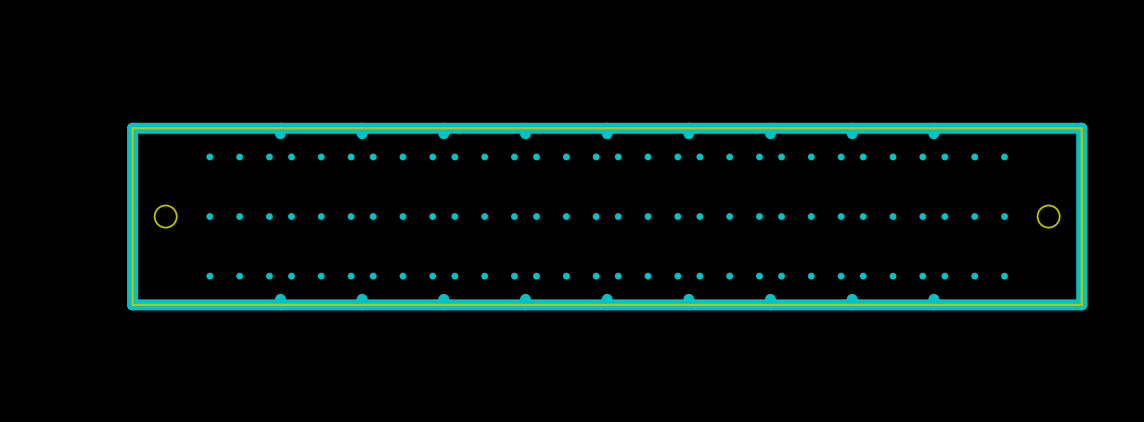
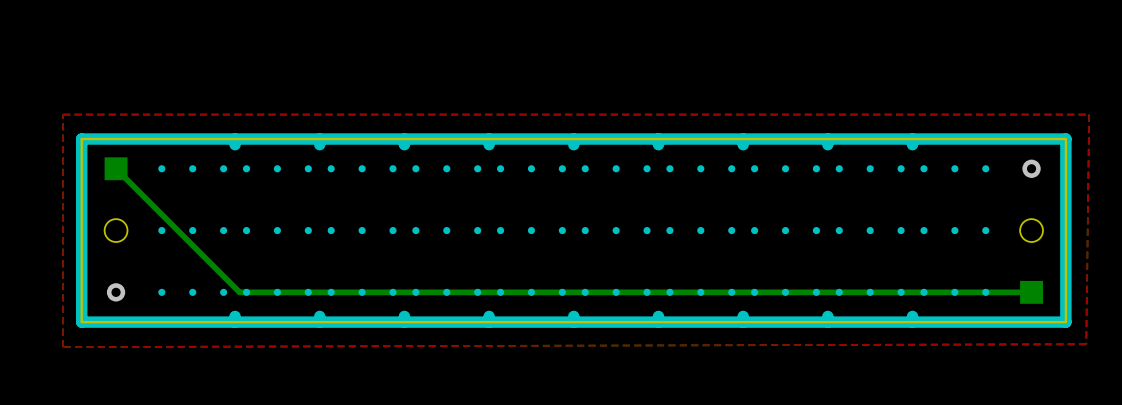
top zone outline: none -> (63, 114) (63, 347) (1086, 344) (1089, 114) (63, 114)
bottom track: none -> (116, 168) (239, 292) (1031, 292)
part: none -> (116, 168)
via: none -> (1031, 168)
via: none -> (116, 292)
part: none -> (1031, 292)

